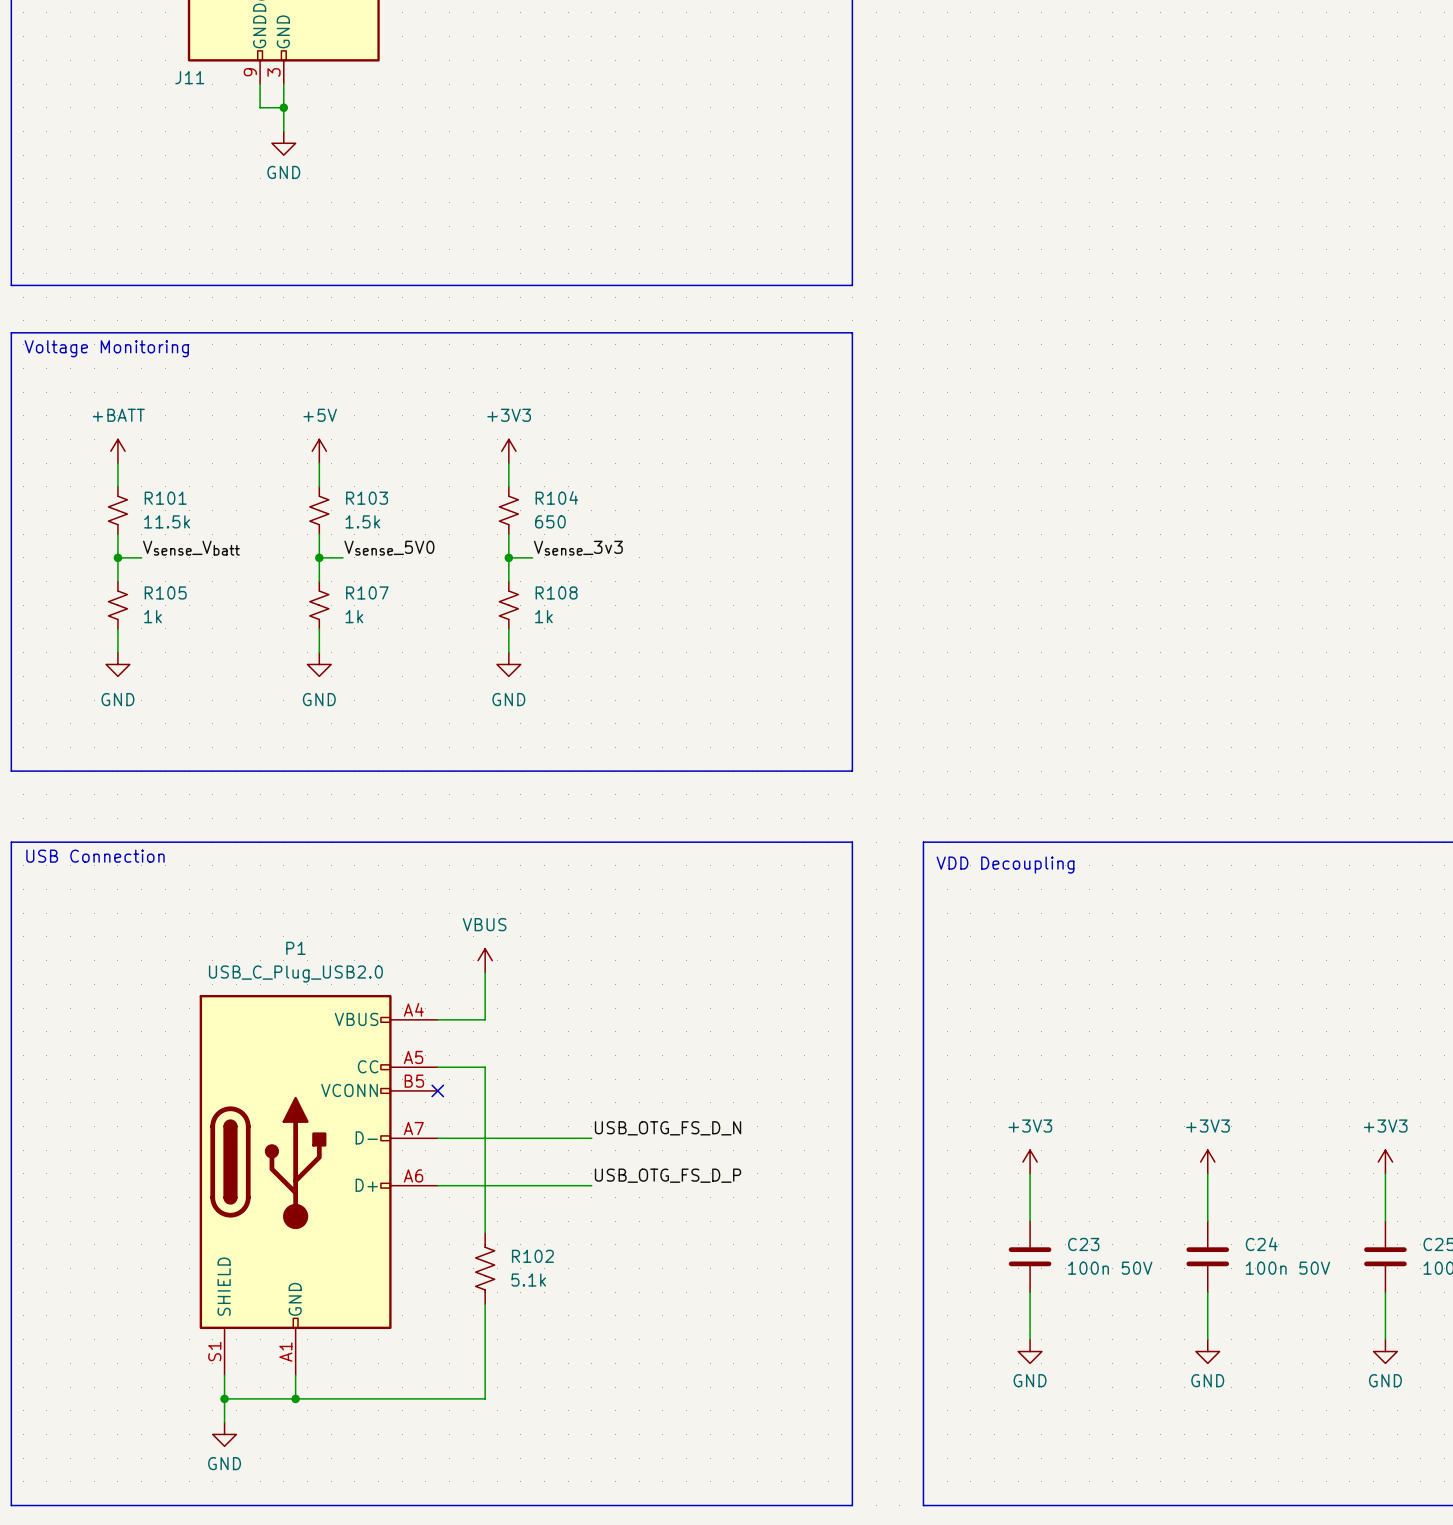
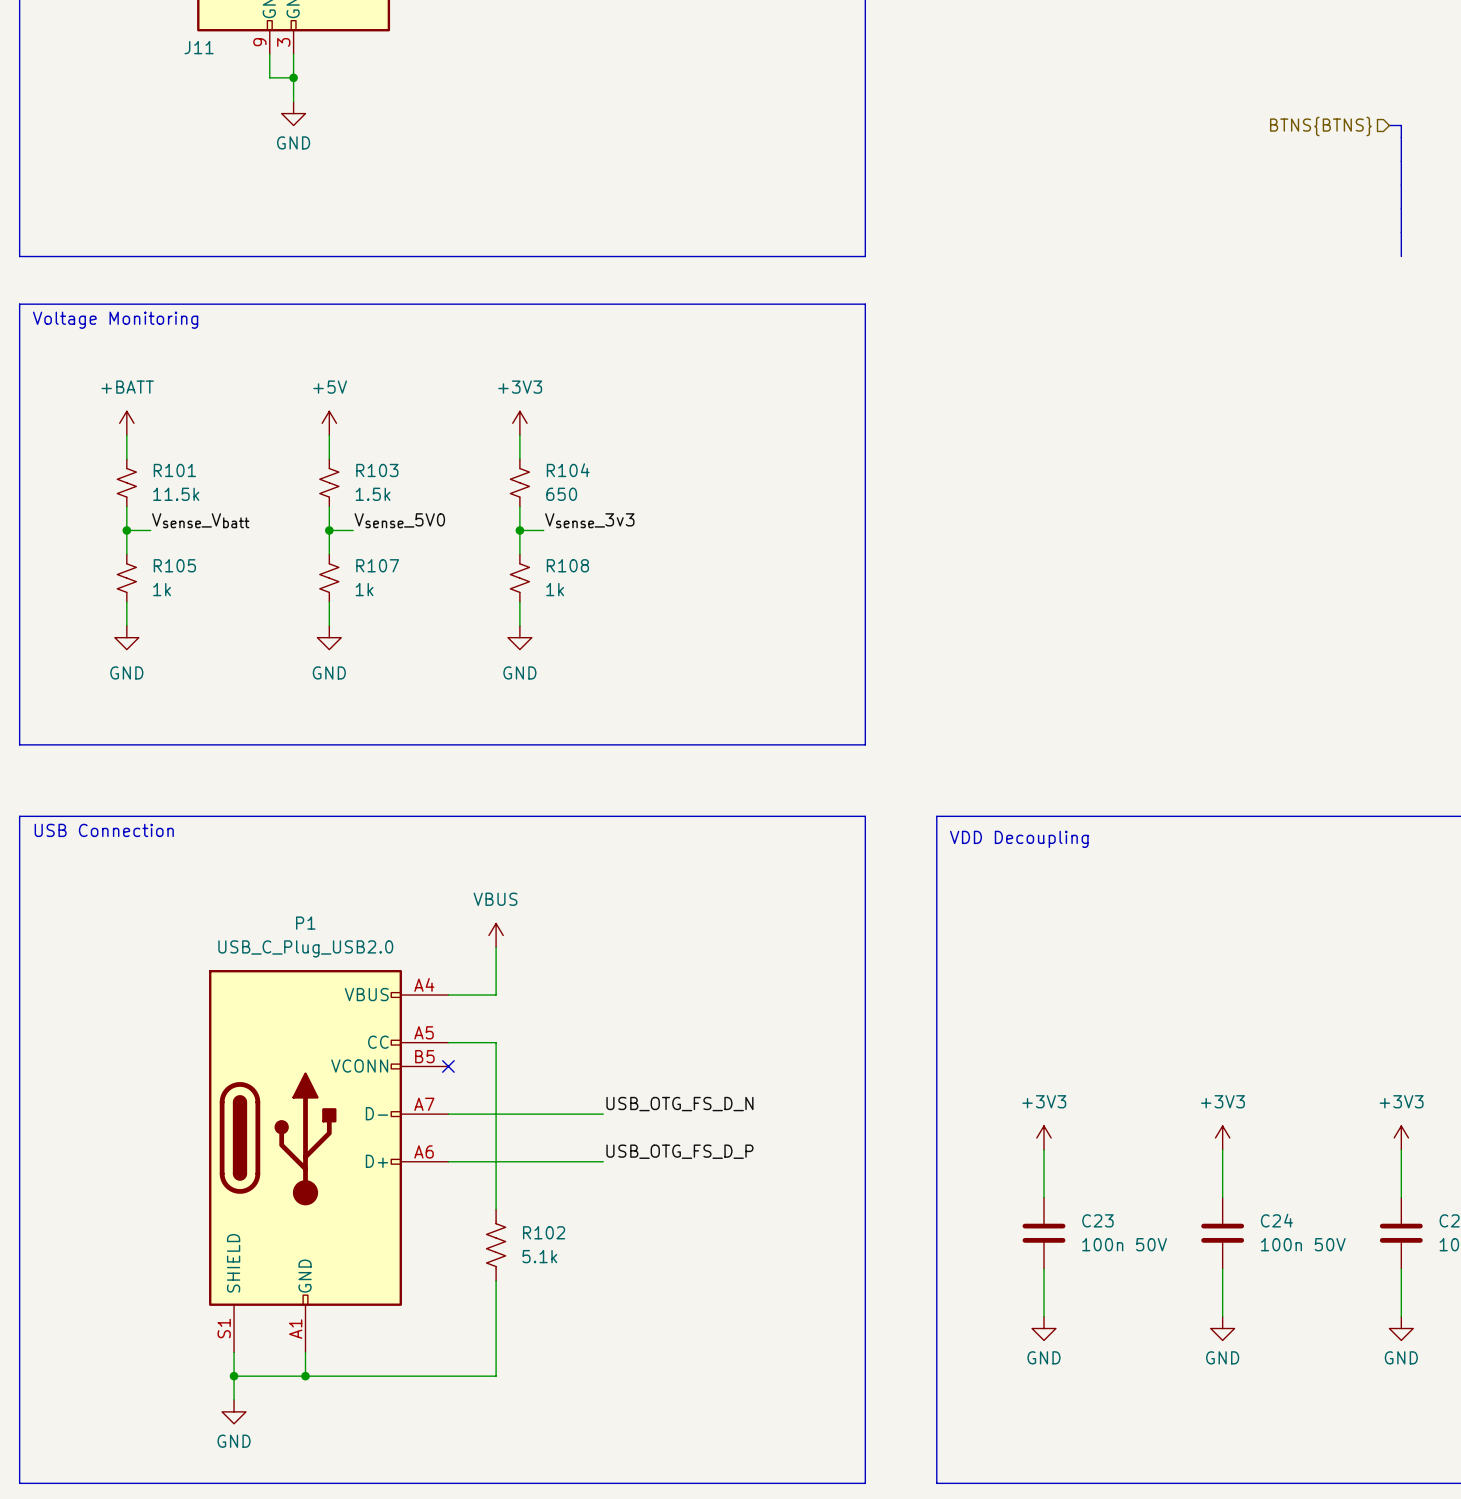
bus: none -> (1389, 125) (1401, 125) (1401, 256)
hierarchical label: none -> BTNS{BTNS} (1320, 126)

